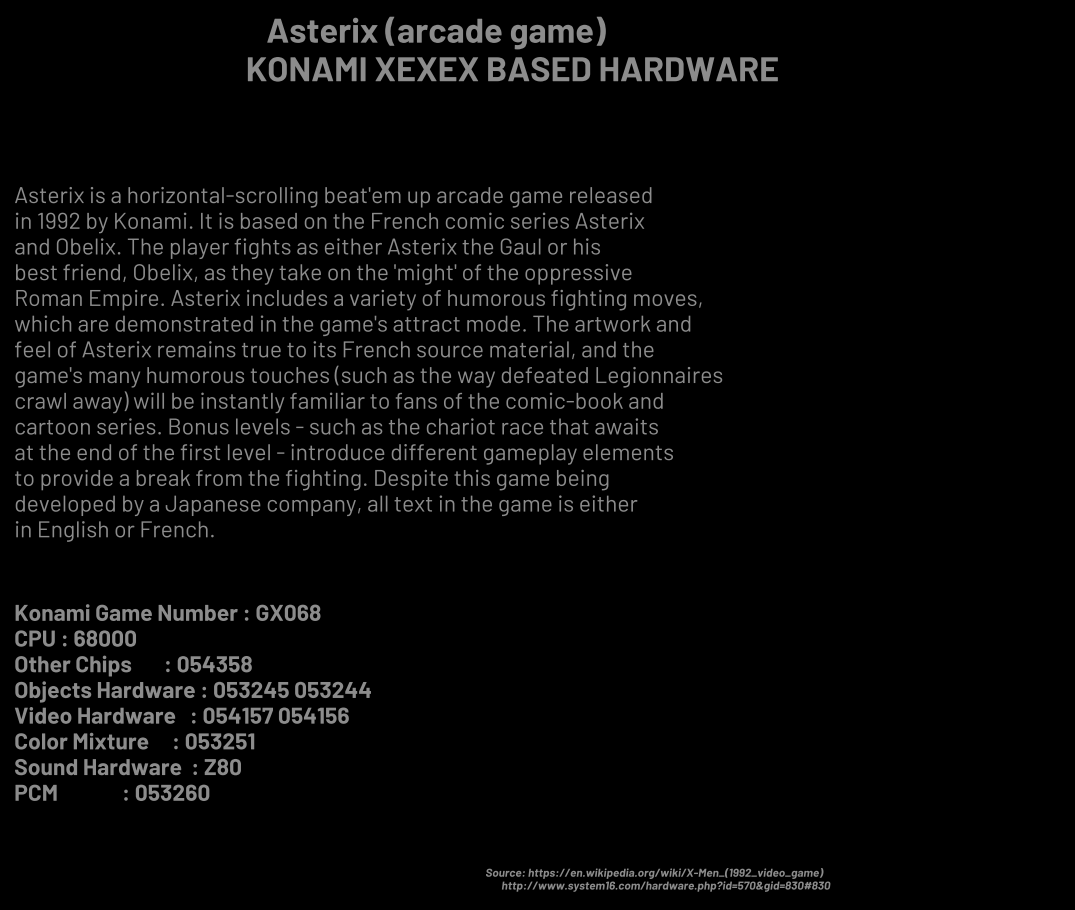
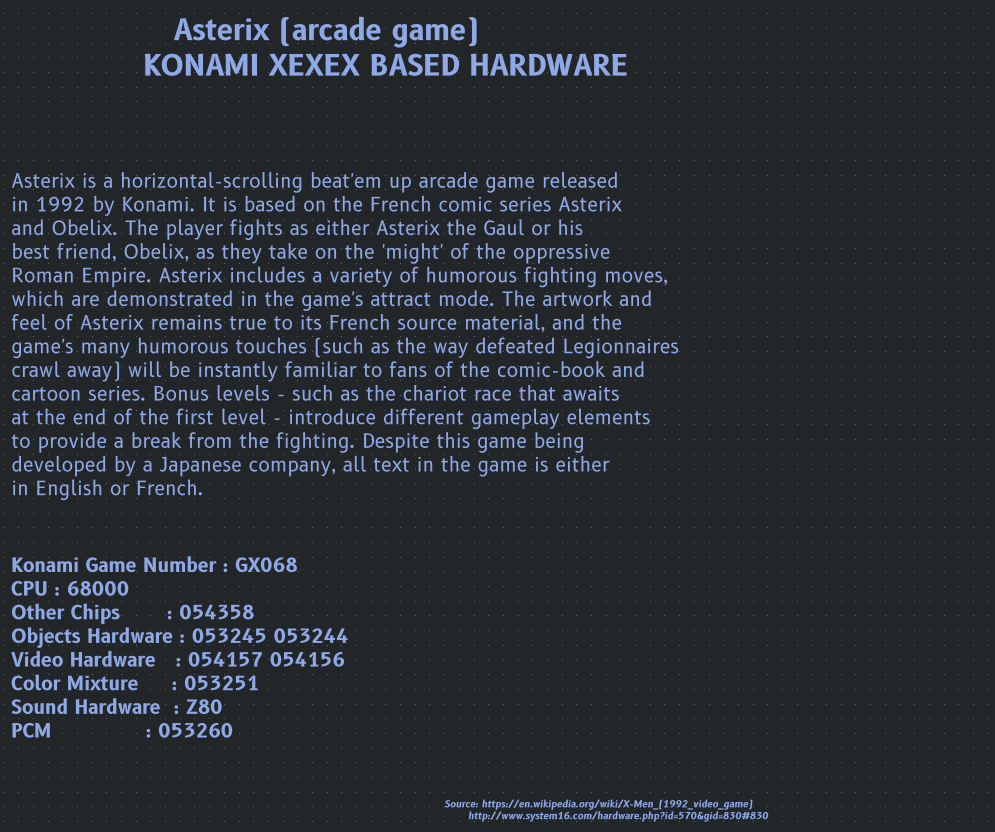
text position: Asterix (arcade game) (436, 33) -> Asterix (arcade game) (325, 32)
text position: KONAMI XEXEX BASED HARDWARE (512, 69) -> KONAMI XEXEX BASED HARDWARE (385, 64)

